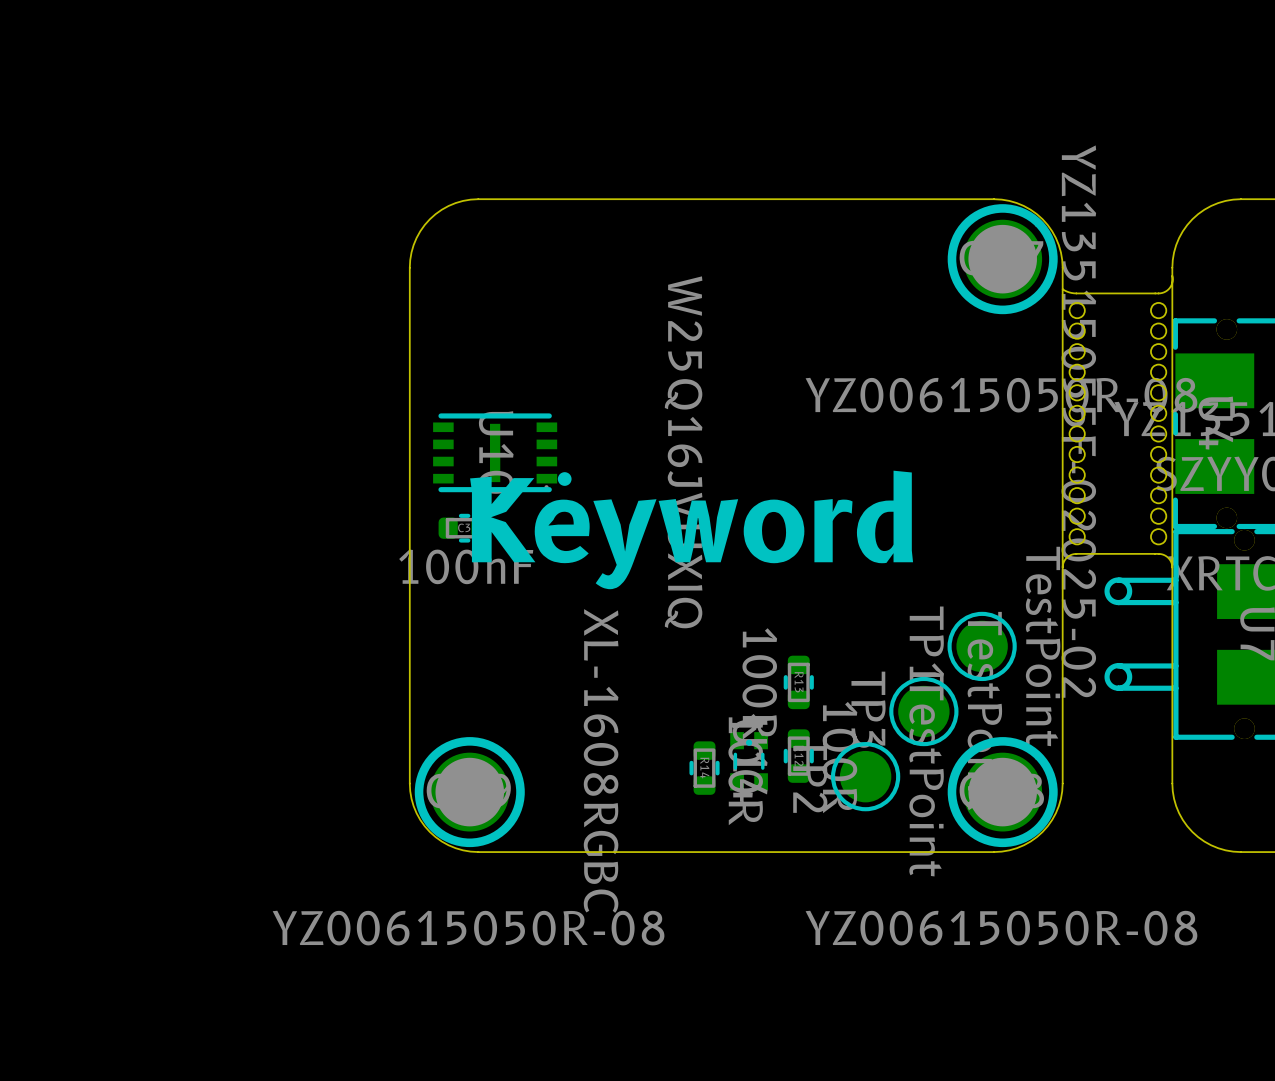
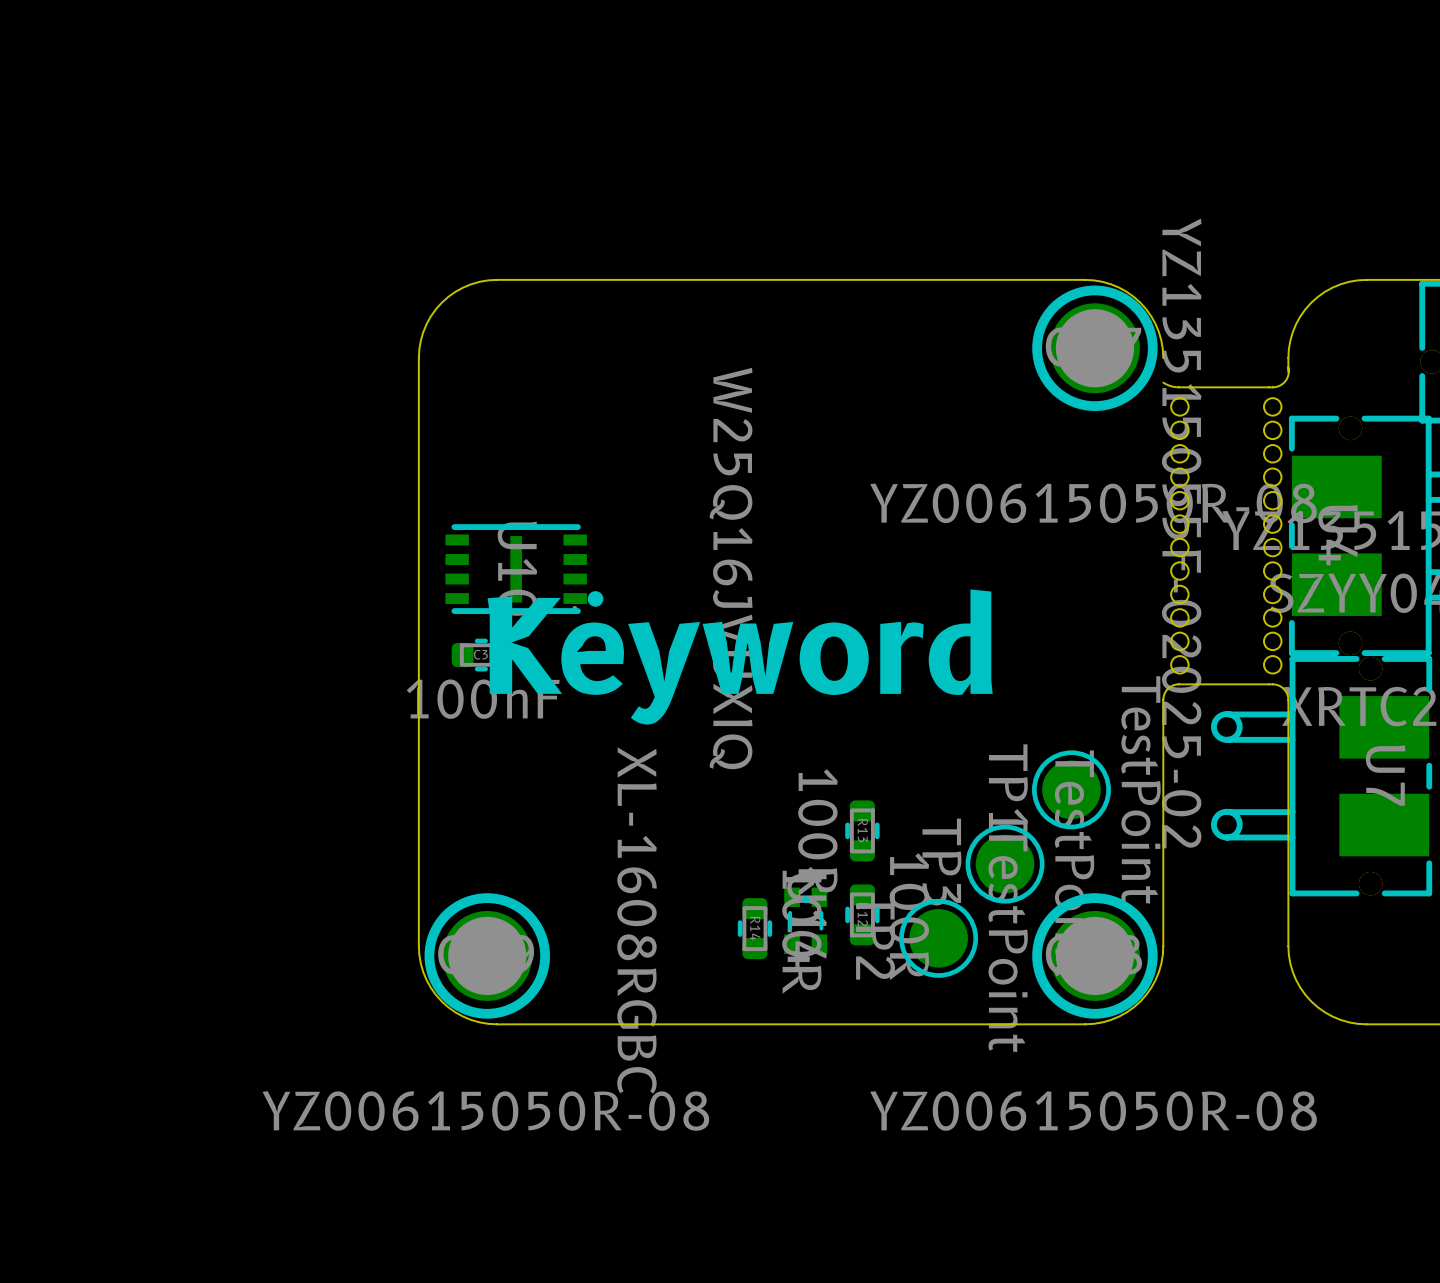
board edge: (1062, 267) (1062, 567) -> none
board edge: (1172, 279) (1172, 567) -> none

